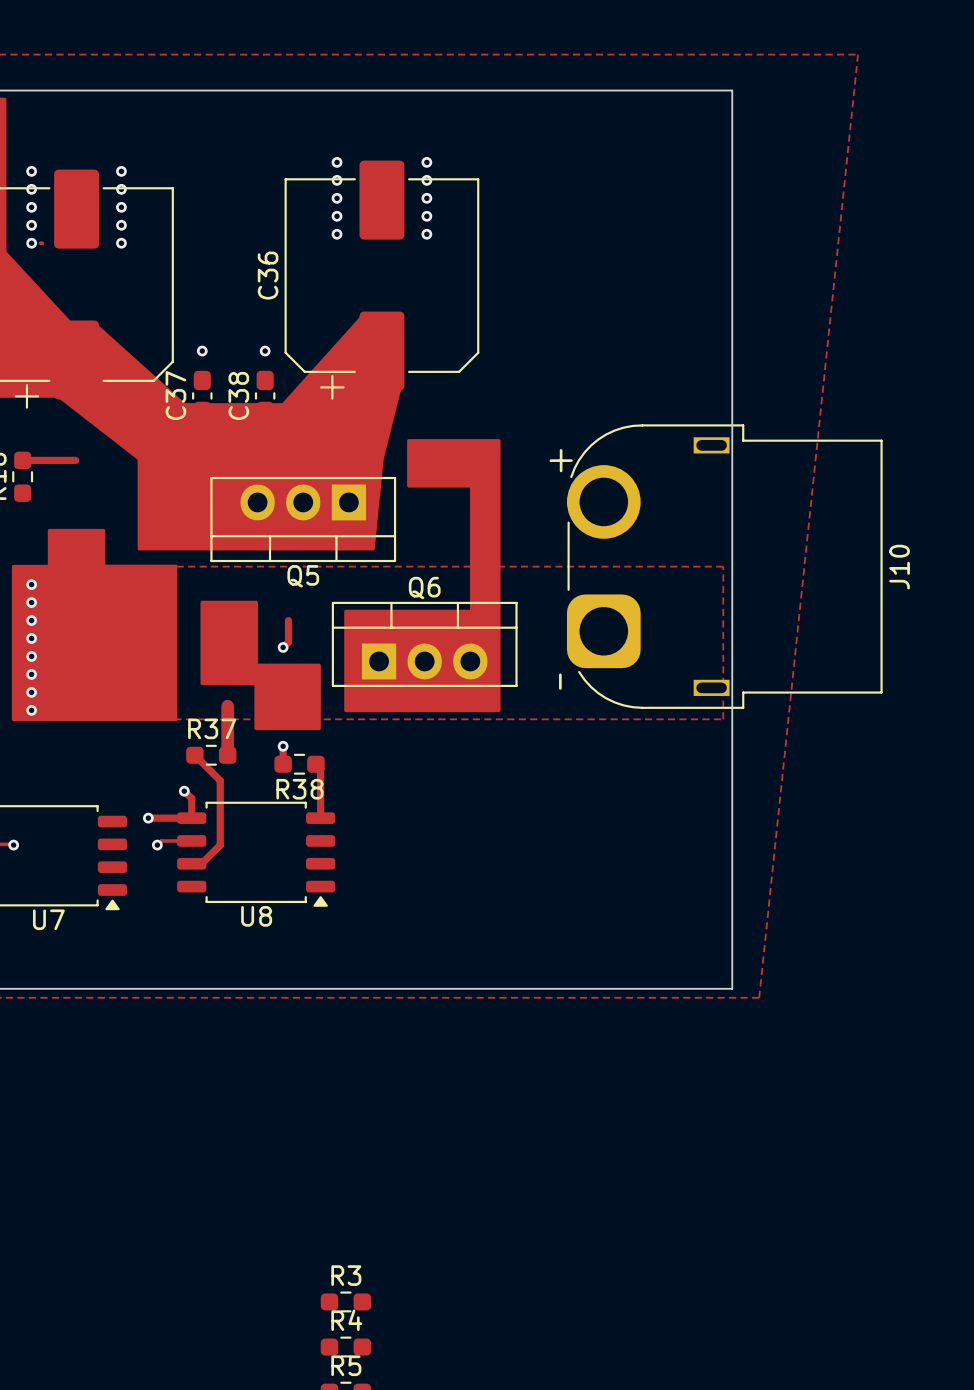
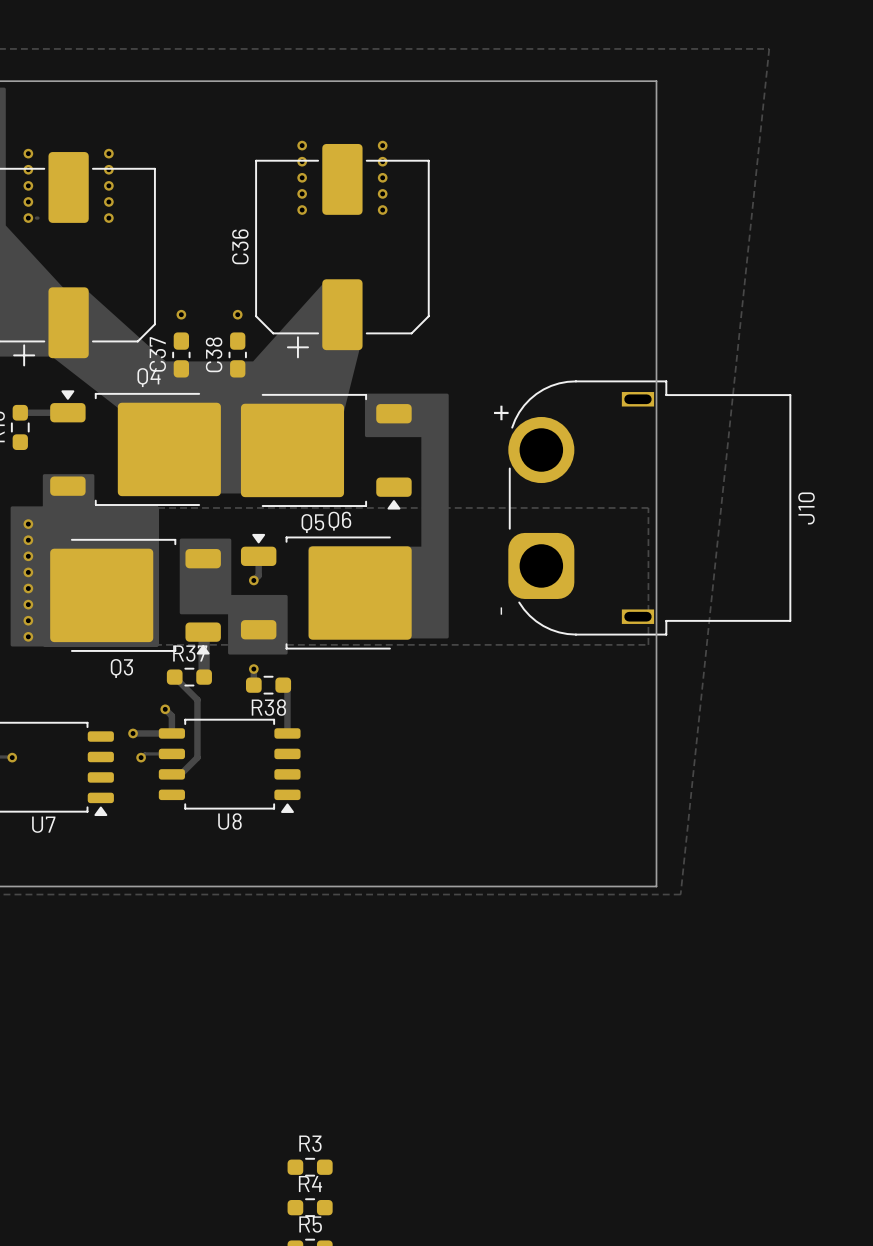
Q5 footprint: [210, 476, 397, 563] -> [240, 393, 412, 510]
Q4: none -> (135, 448)
Q6 footprint: [331, 601, 518, 687] -> [240, 533, 412, 650]
Q3: none -> (135, 596)

